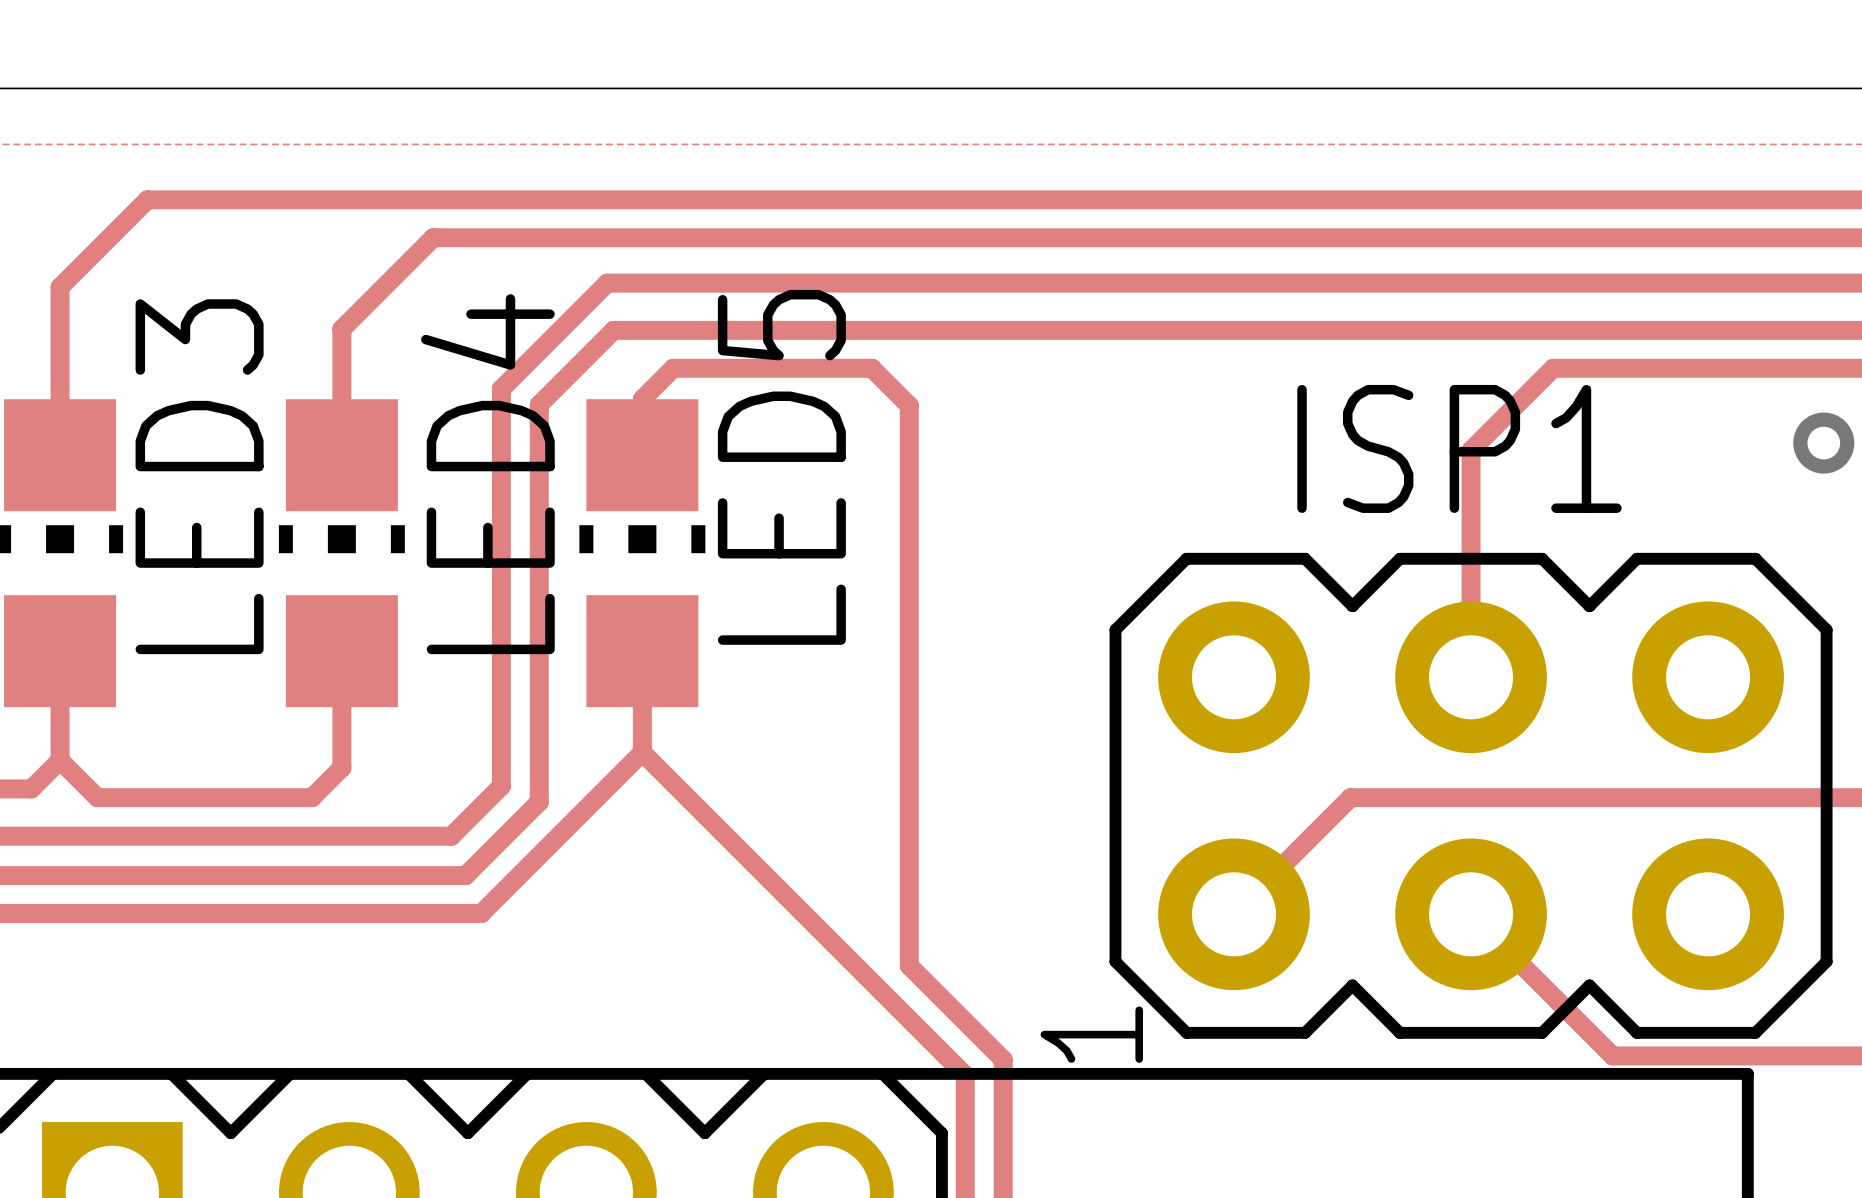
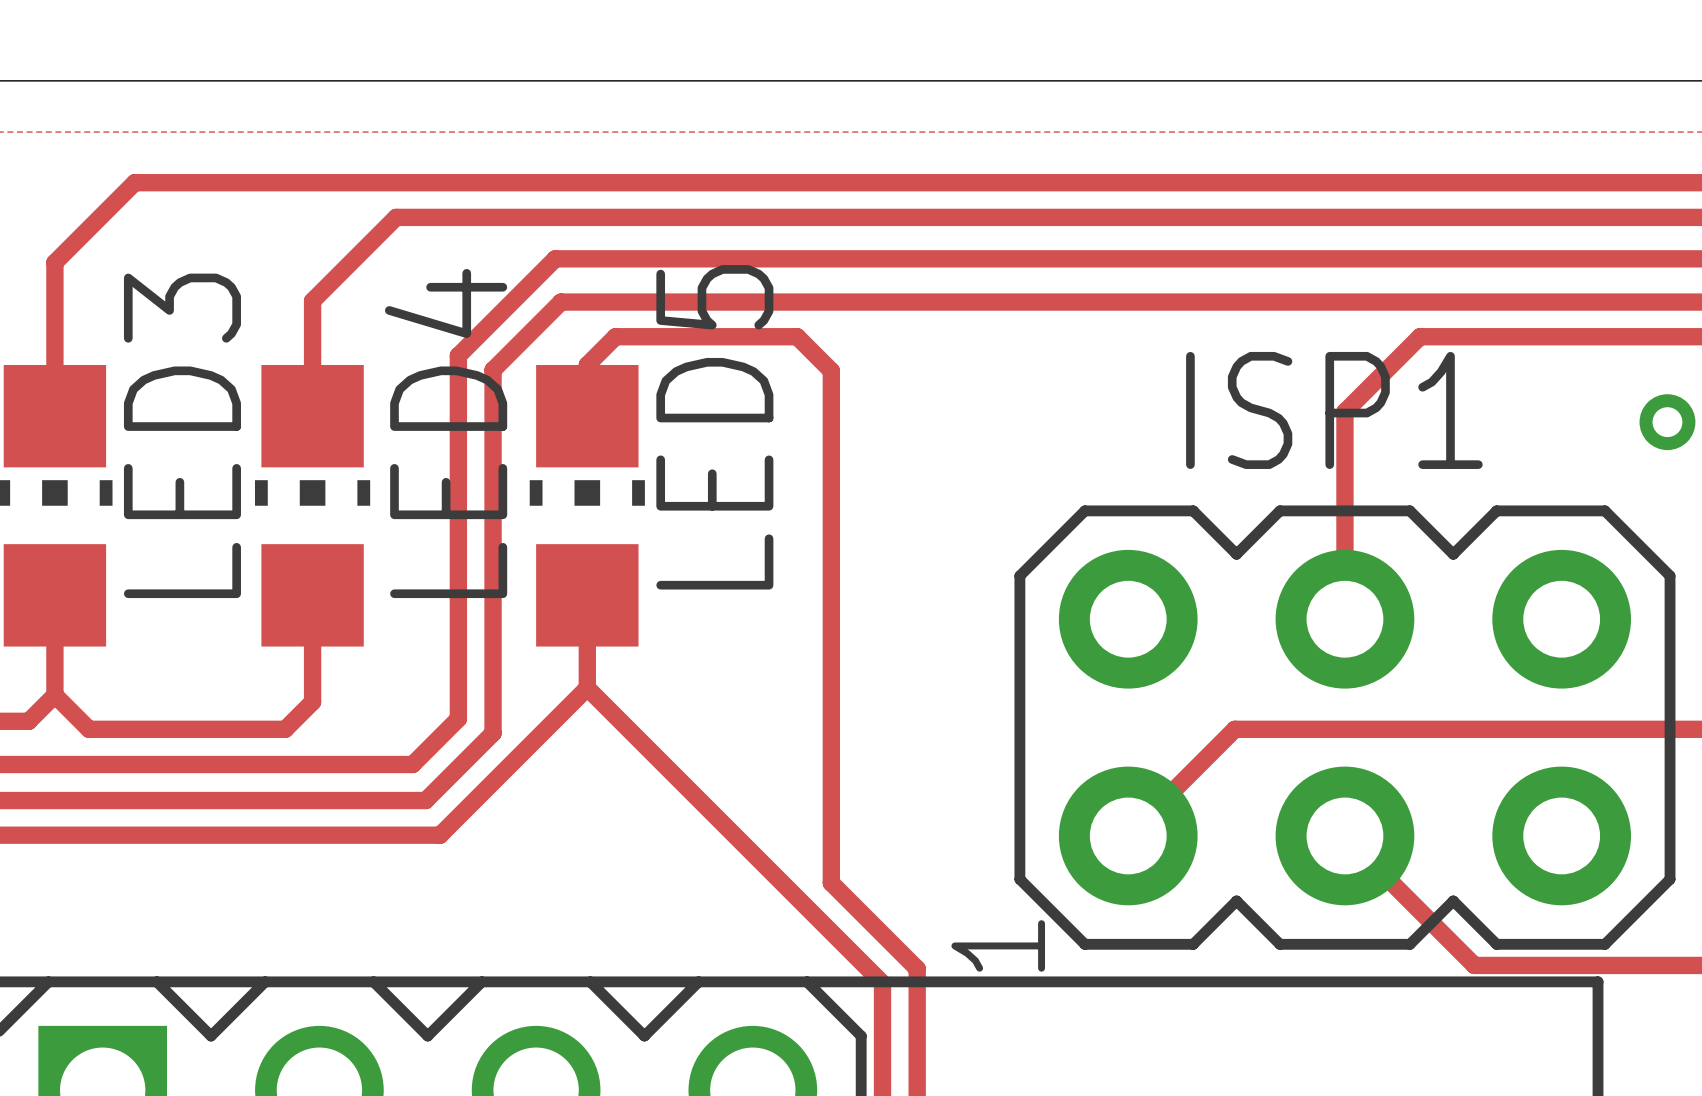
via position: (1823, 443) -> (1667, 422)

